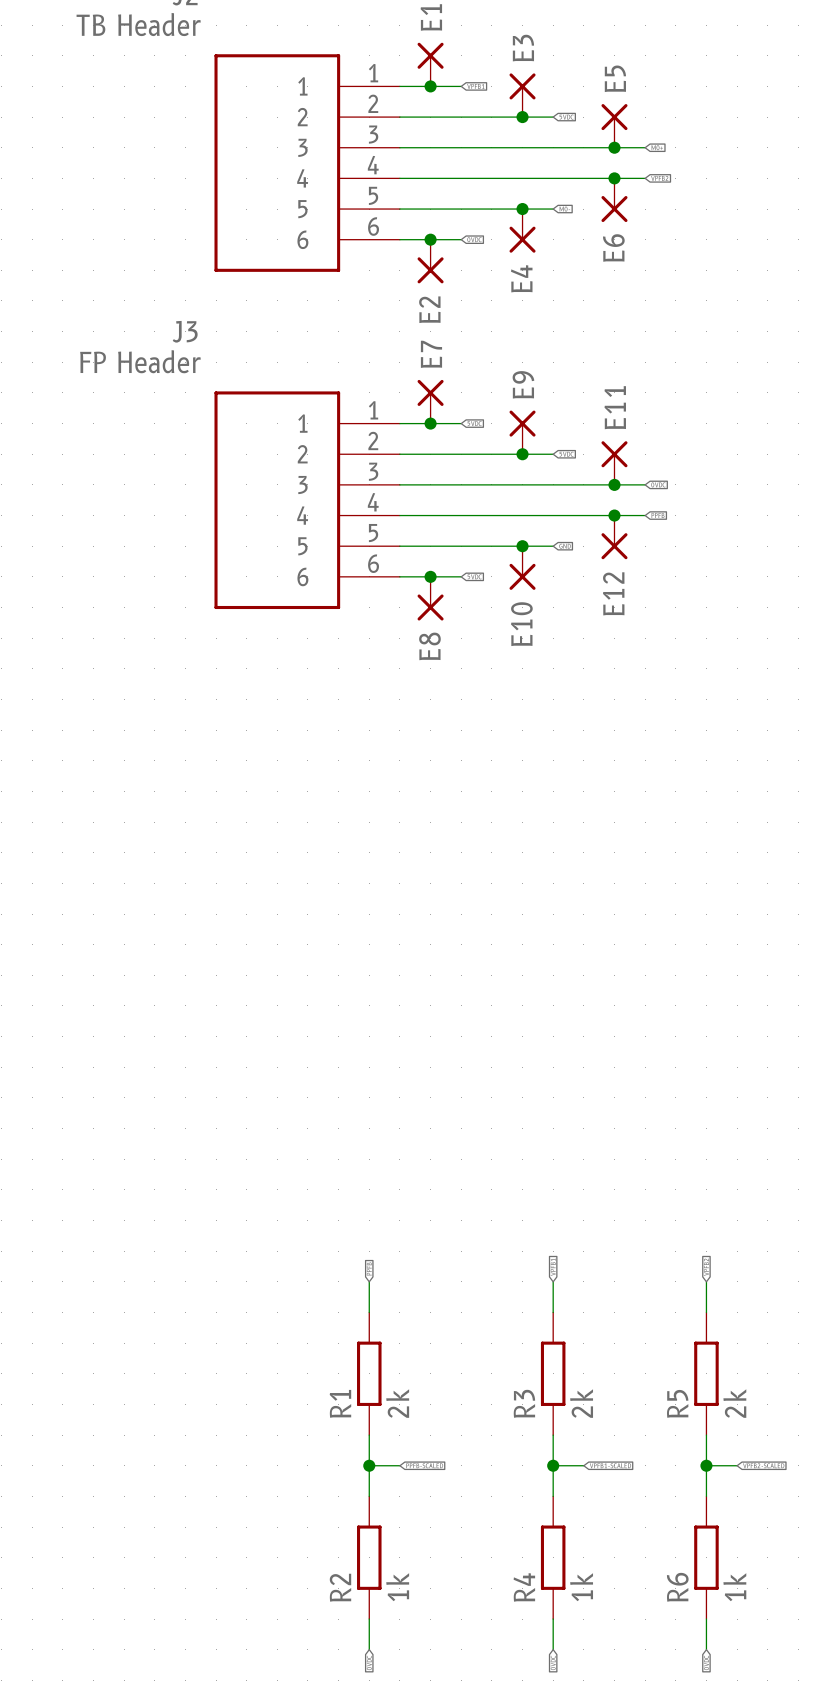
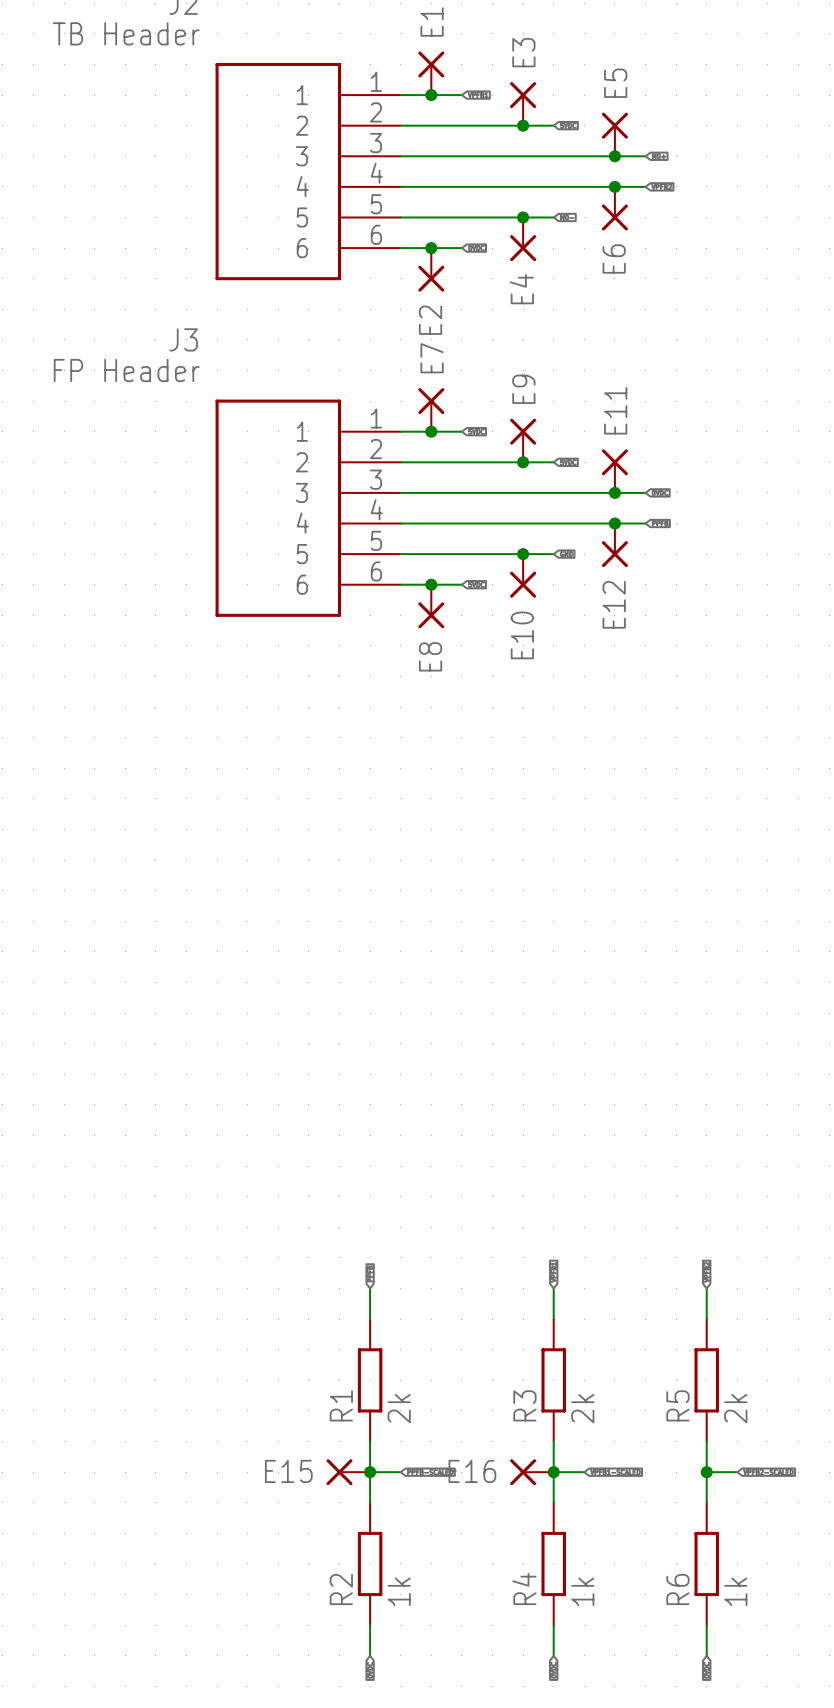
E15: none -> (348, 1472)
E16: none -> (531, 1472)

